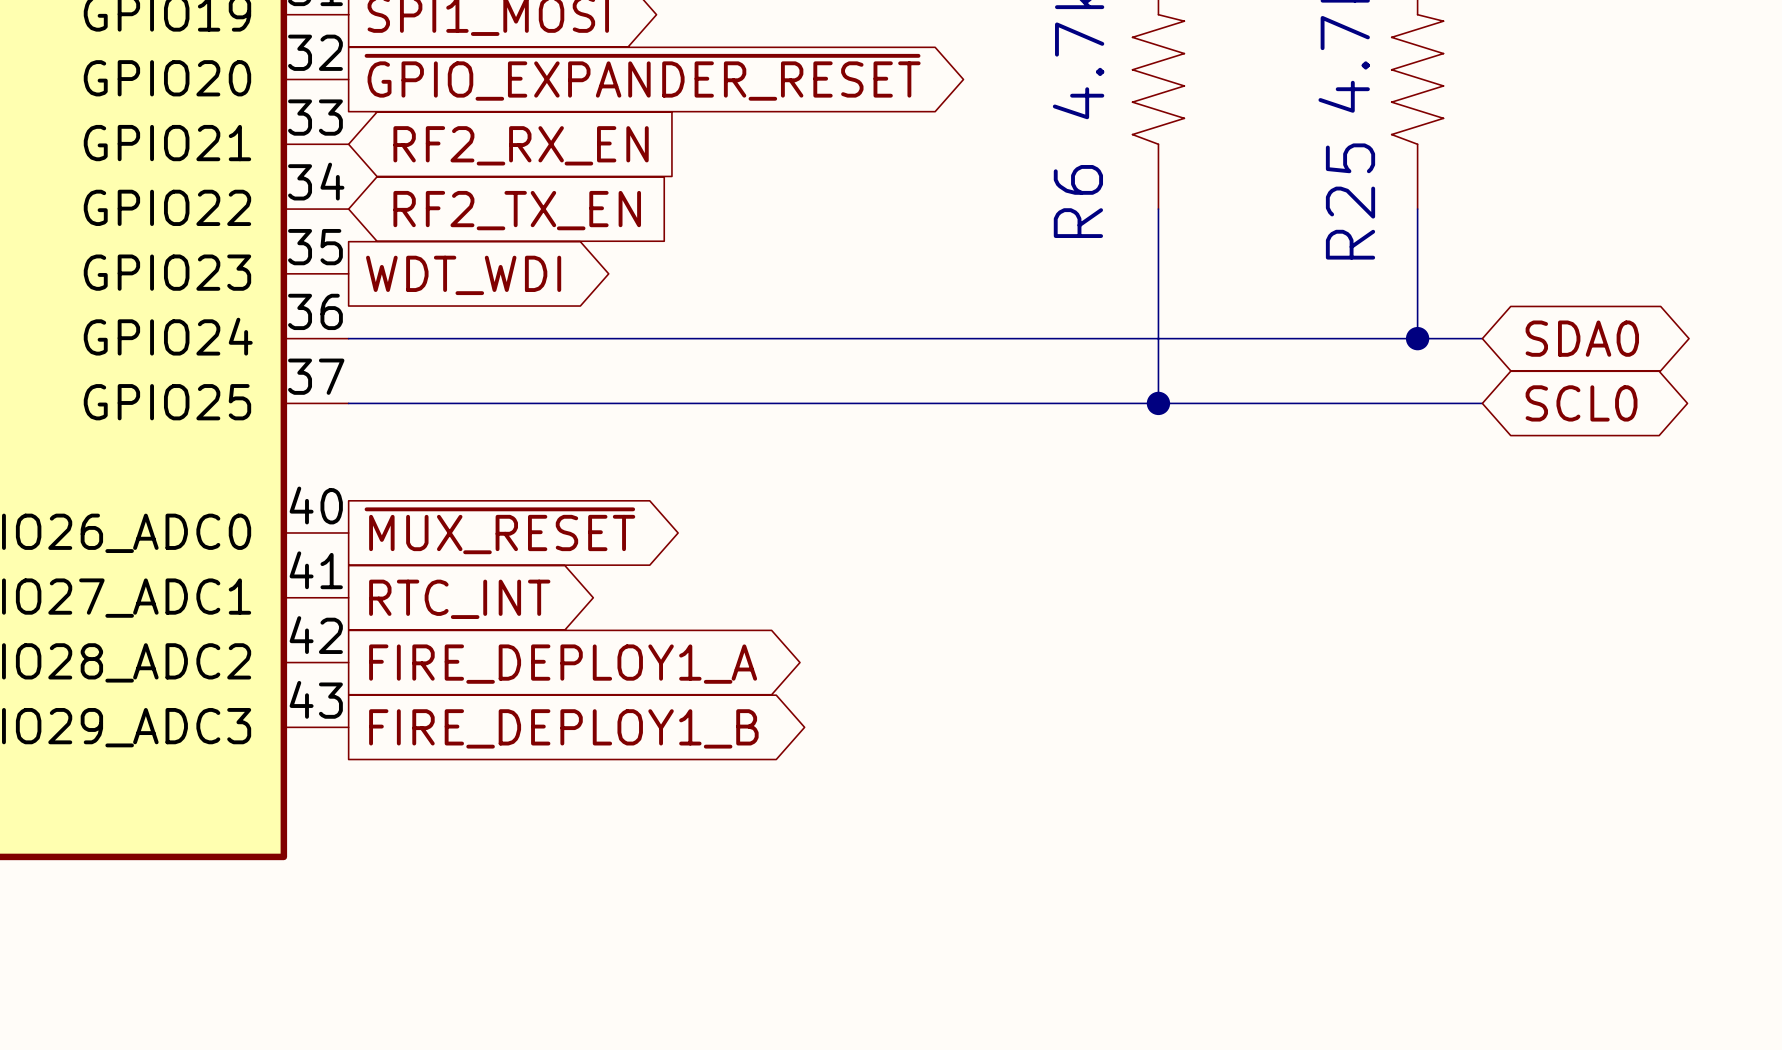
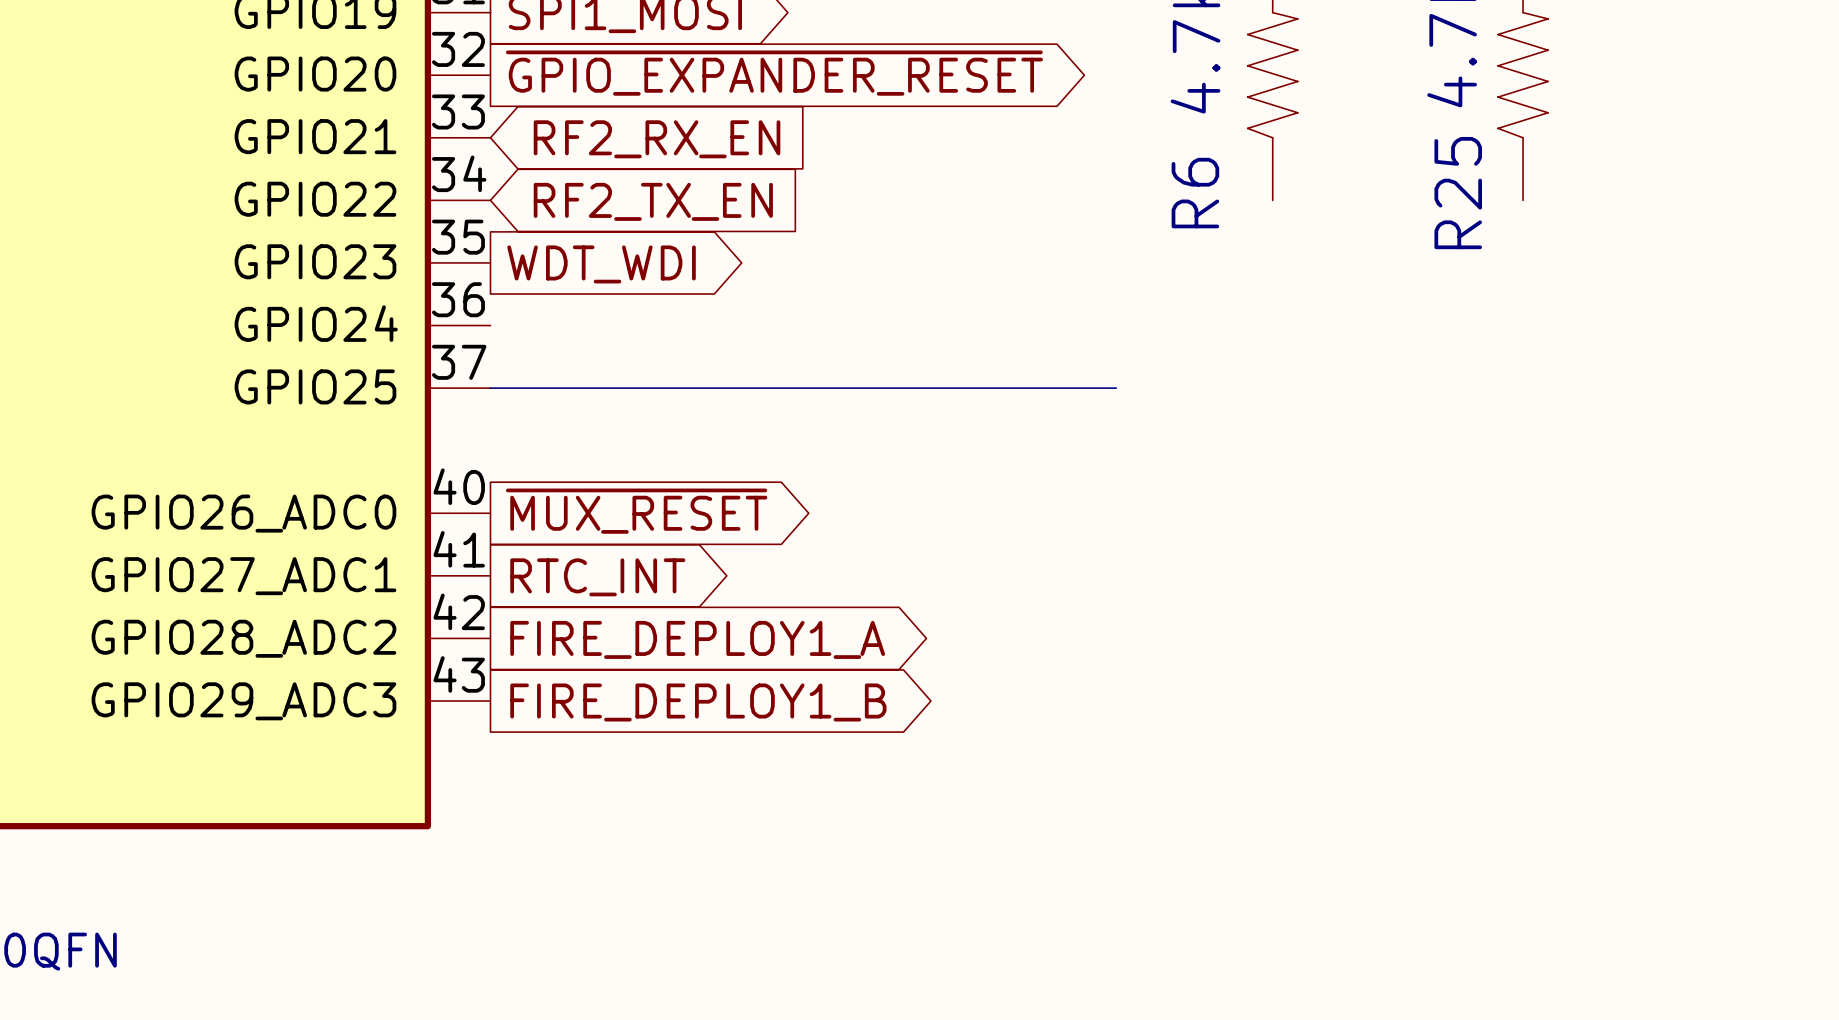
wire: (1158, 209) (1158, 403) -> none
wire: (1417, 209) (1417, 338) -> none
wire: (348, 338) (1482, 338) -> none
junction: (1417, 338) -> none
global label: SDA0 (1582, 338) -> none
wire: (996, 403) (1482, 403) -> none
junction: (1158, 403) -> none
global label: SCL0 (1581, 403) -> none

